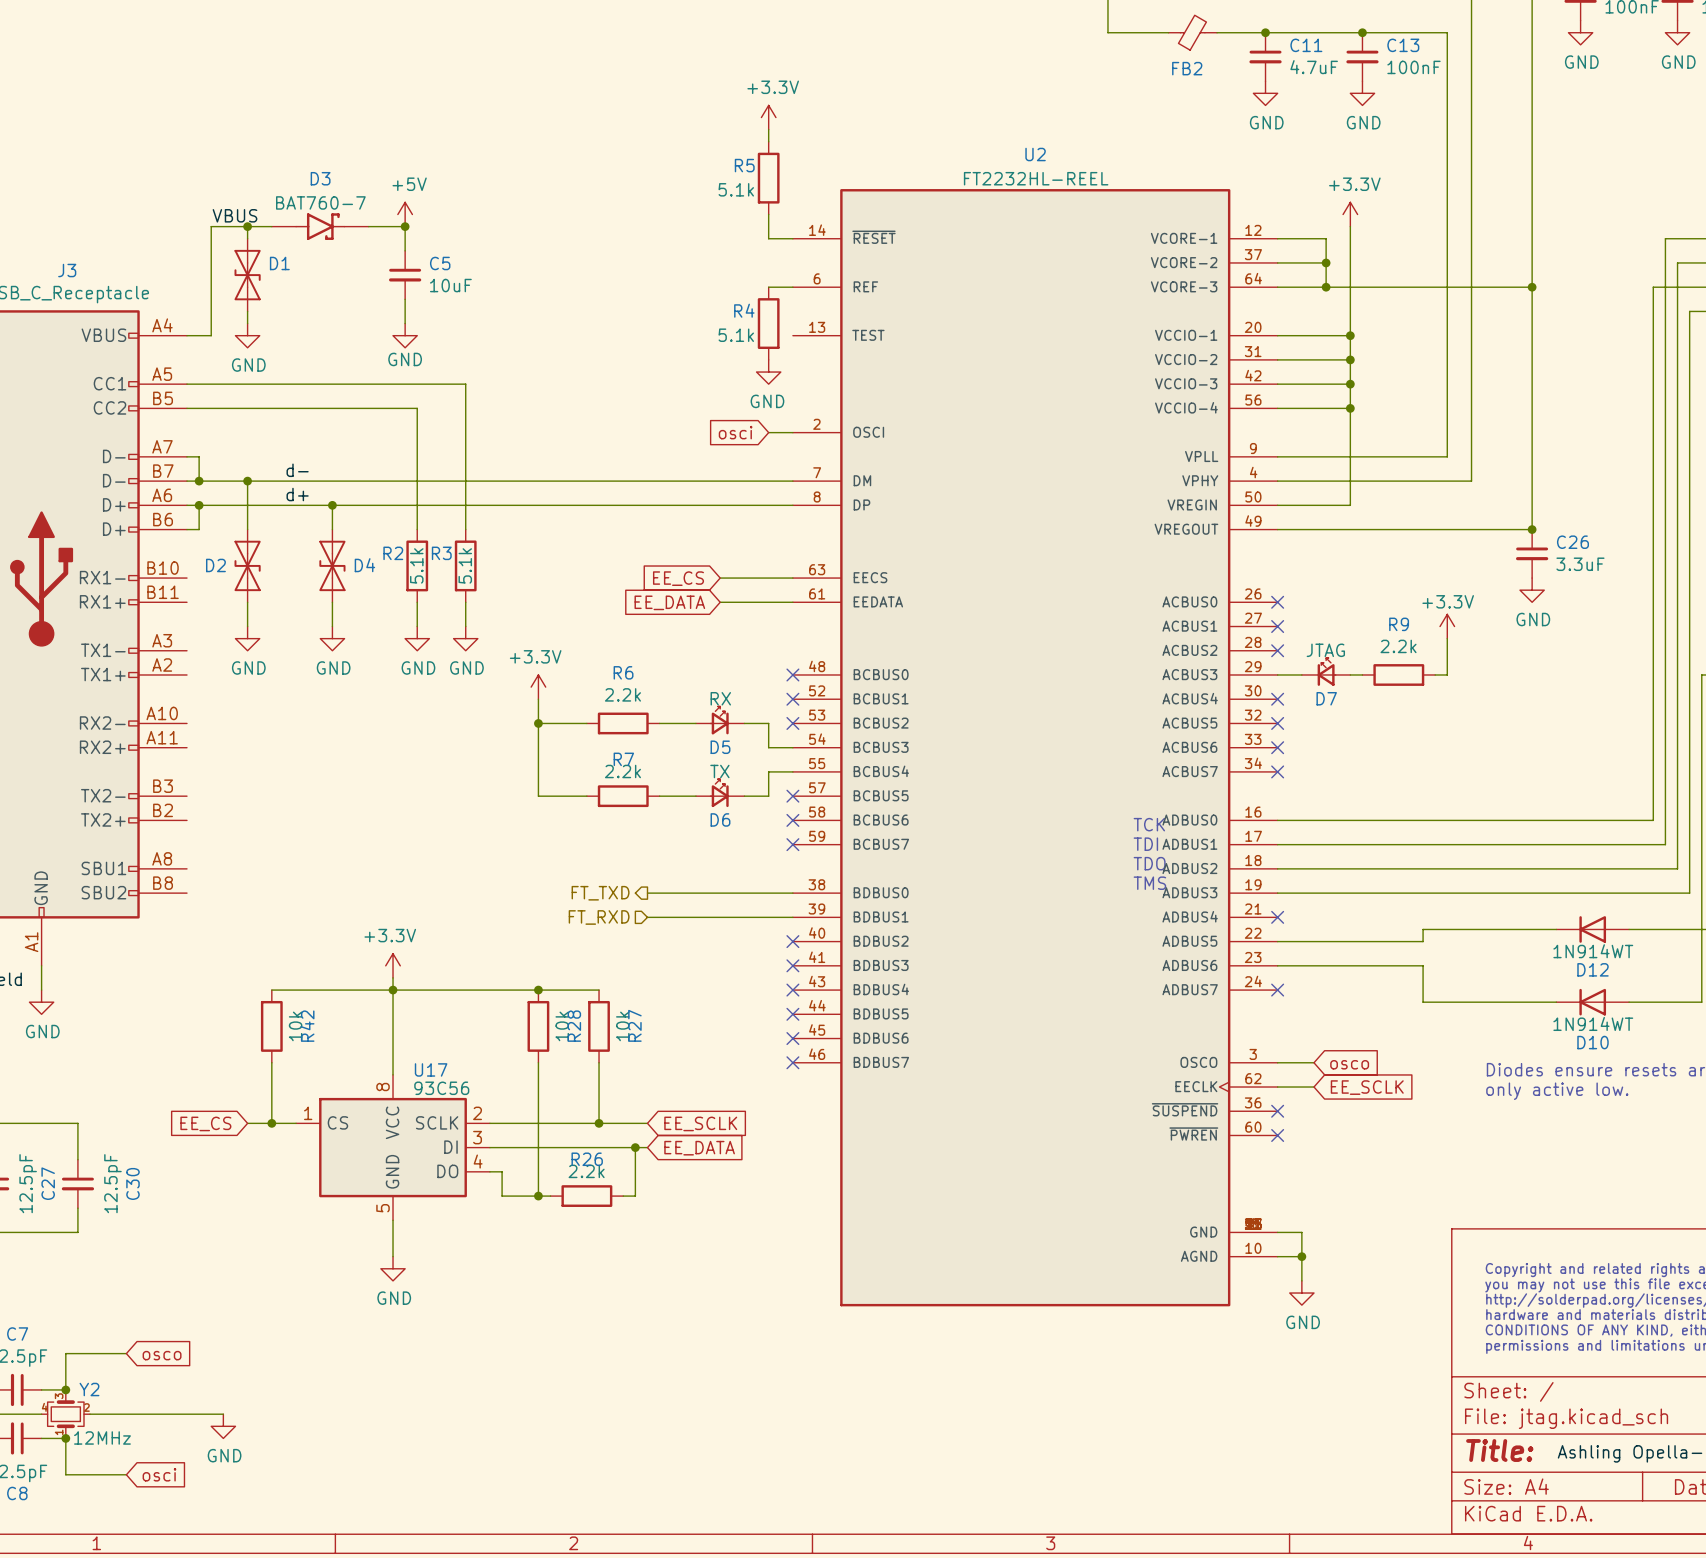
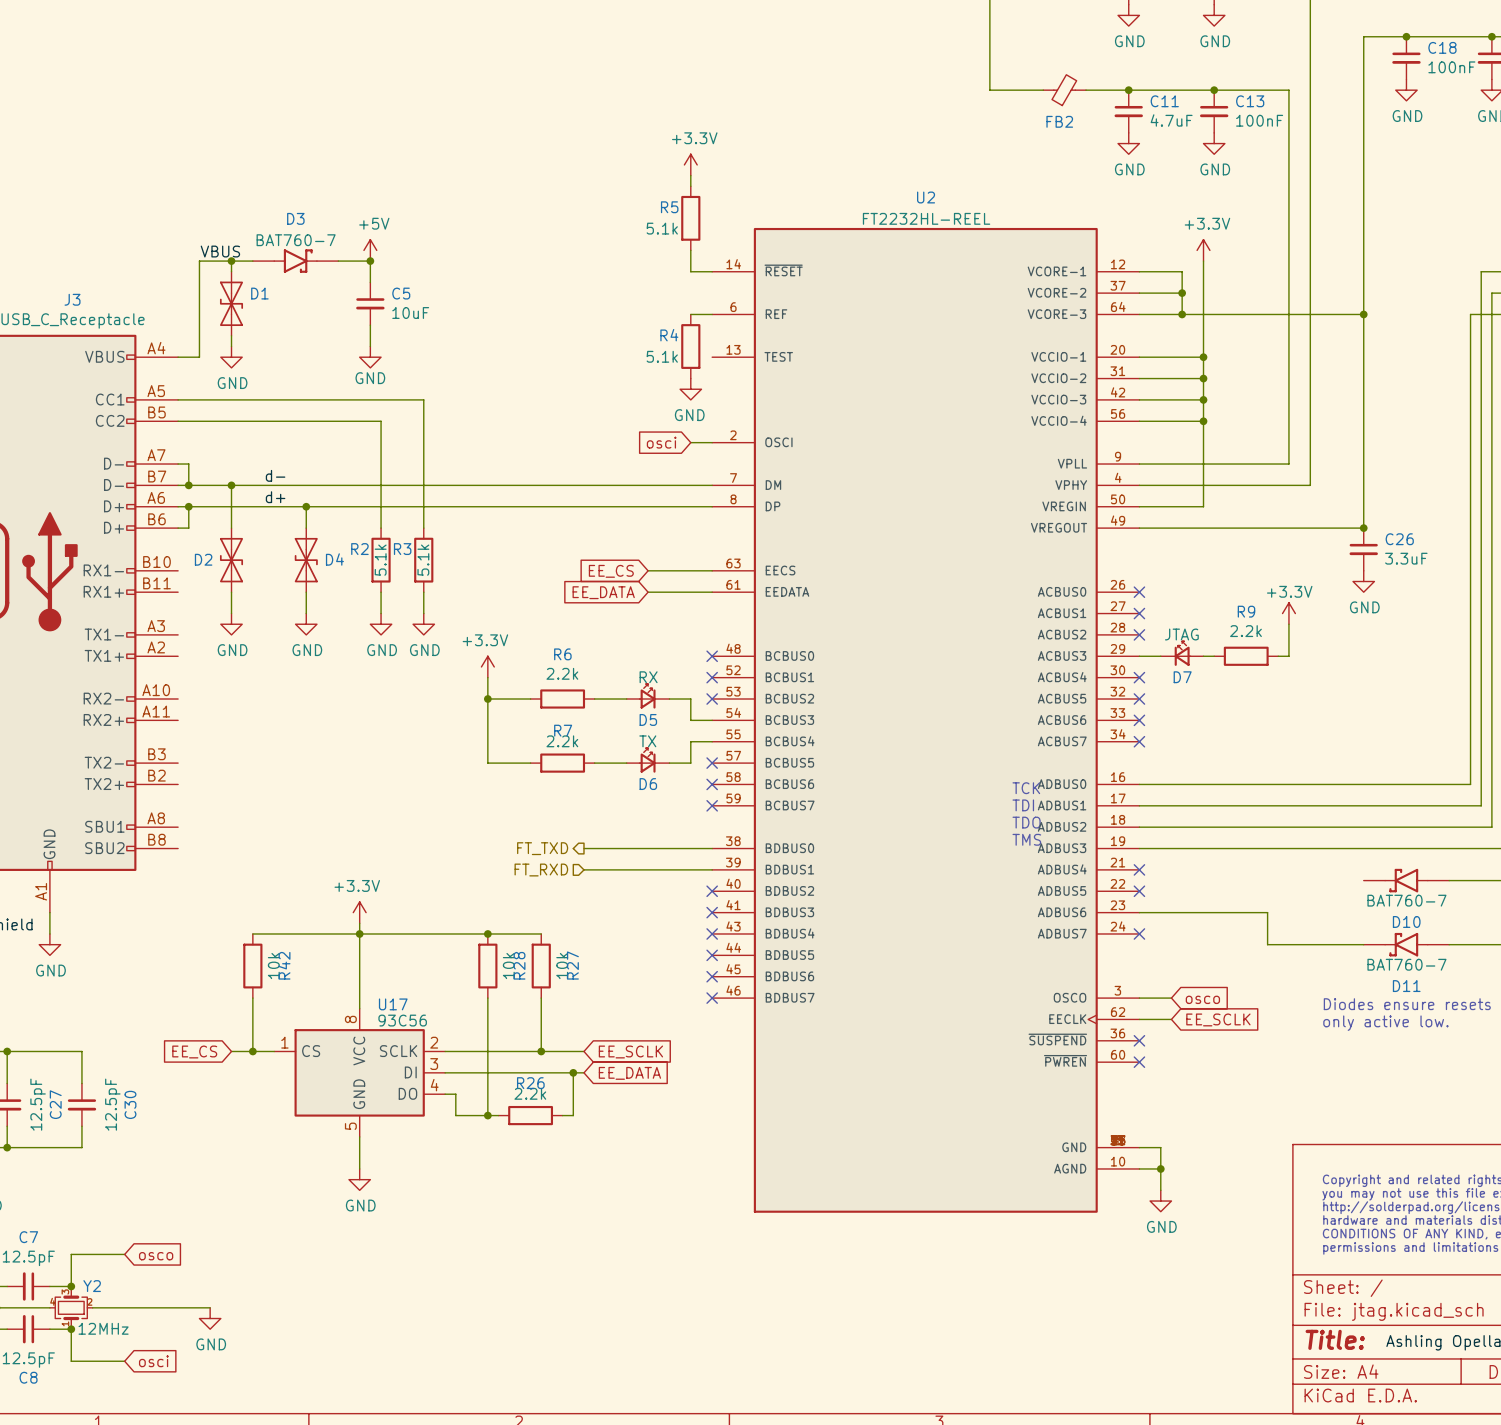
wire: (1556, 929) (1423, 929) (1423, 941) (1277, 941) -> none
D12: 1N914WT (1592, 929) -> none
no-connect mark: none -> (1139, 891)
D10 symbol: [1556, 988, 1630, 1016] -> [1363, 868, 1450, 893]
D11: none -> BAT760-7 (1406, 944)
D10 value: 1N914WT (1593, 1023) -> BAT760-7 (1406, 900)

